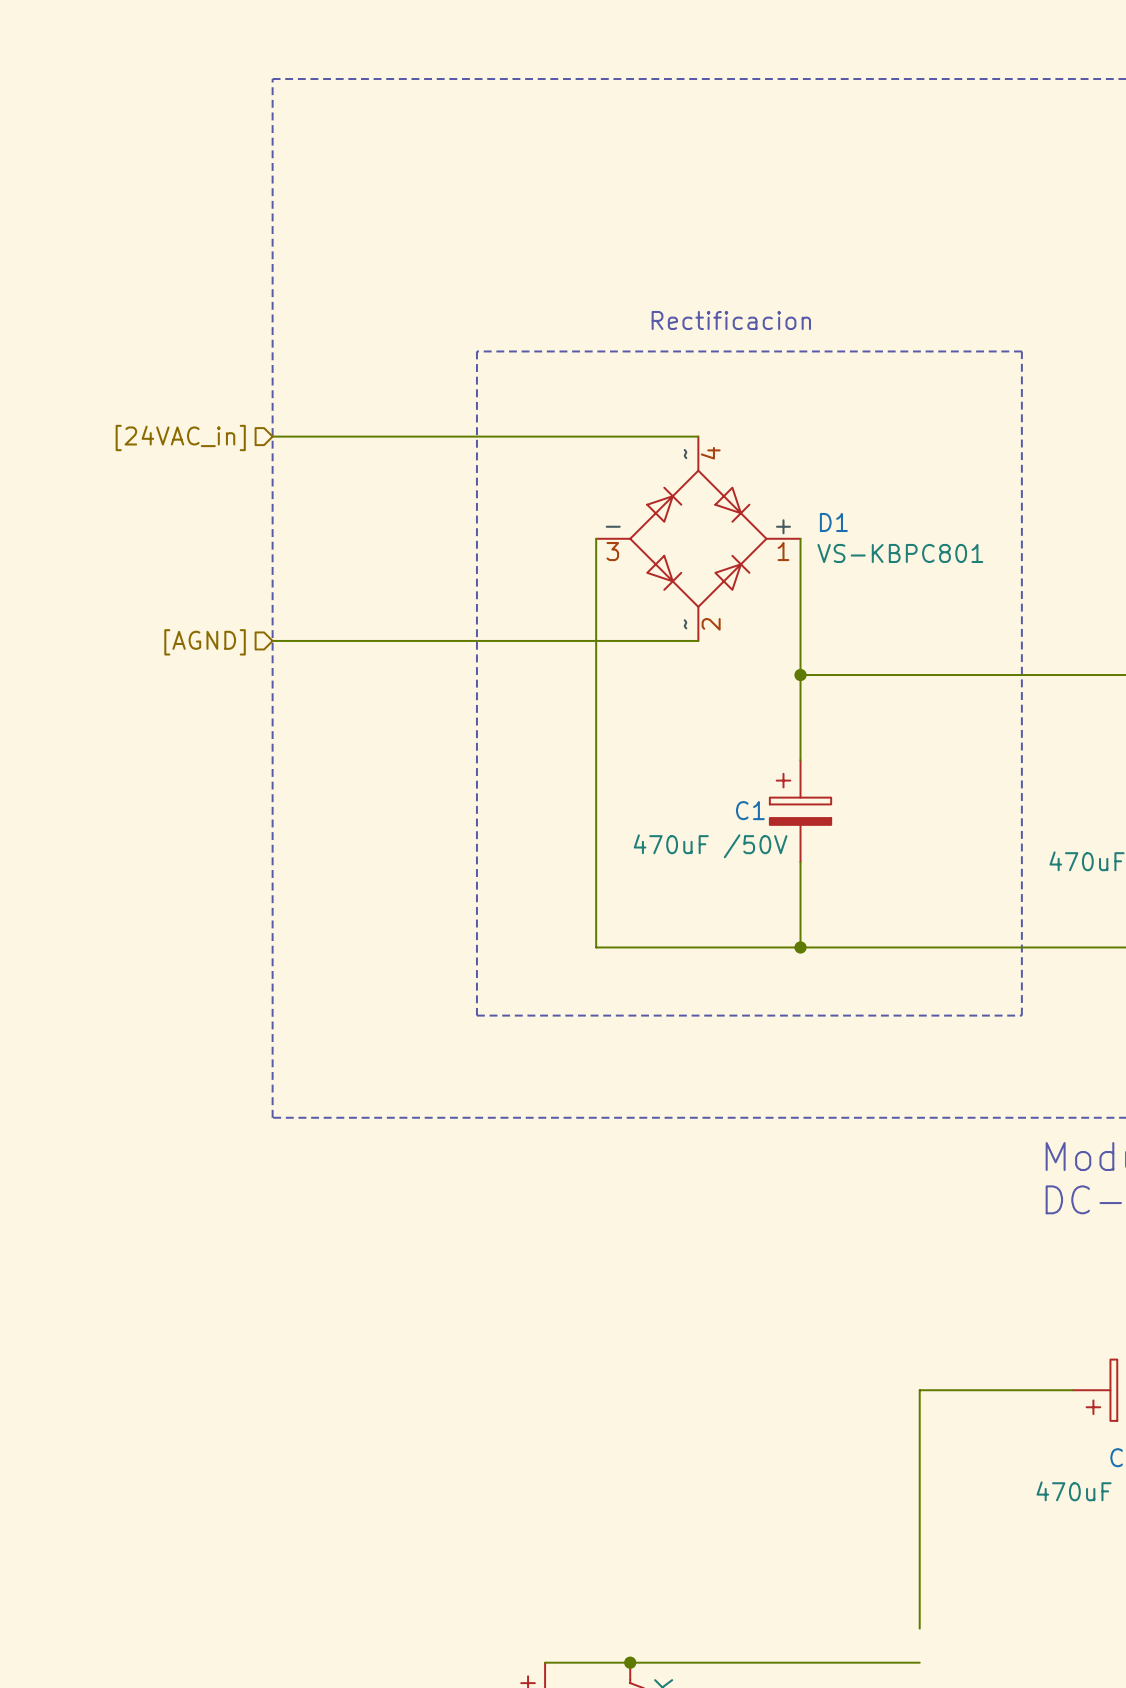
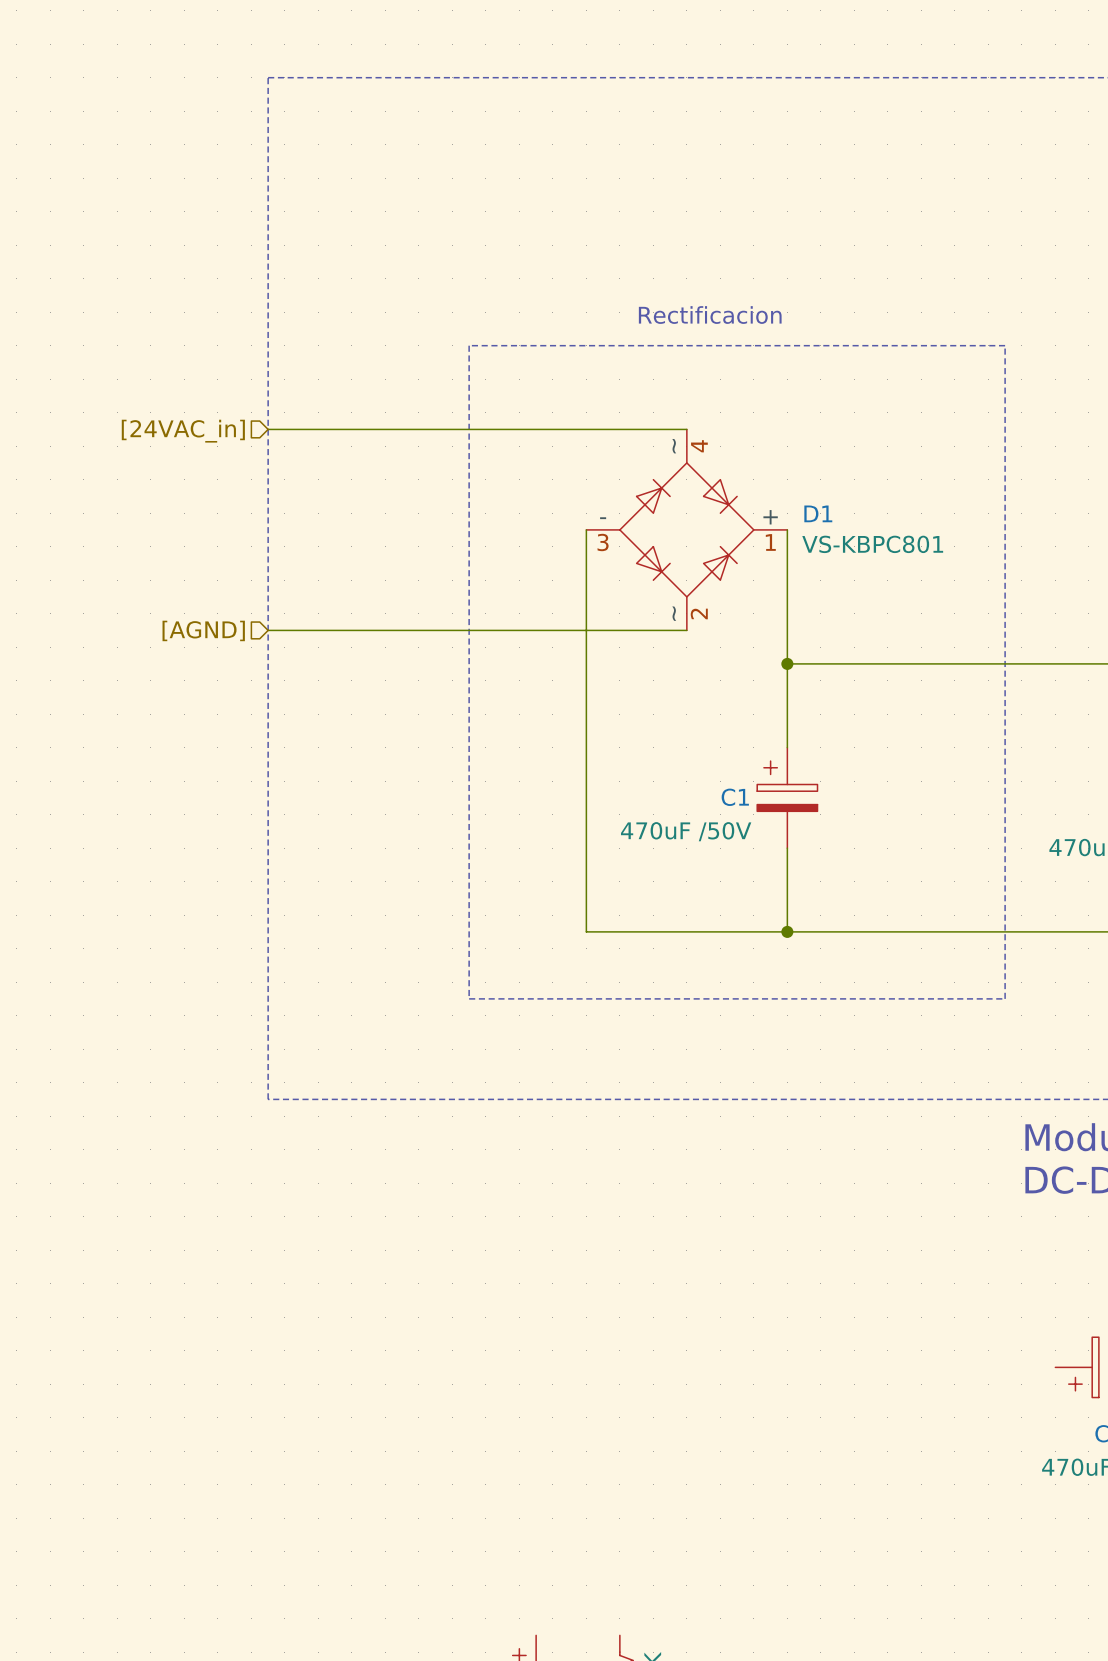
wire: (1072, 1390) (919, 1390) (919, 1628) -> none
wire: (545, 1662) (919, 1662) -> none
junction: (630, 1662) -> none

